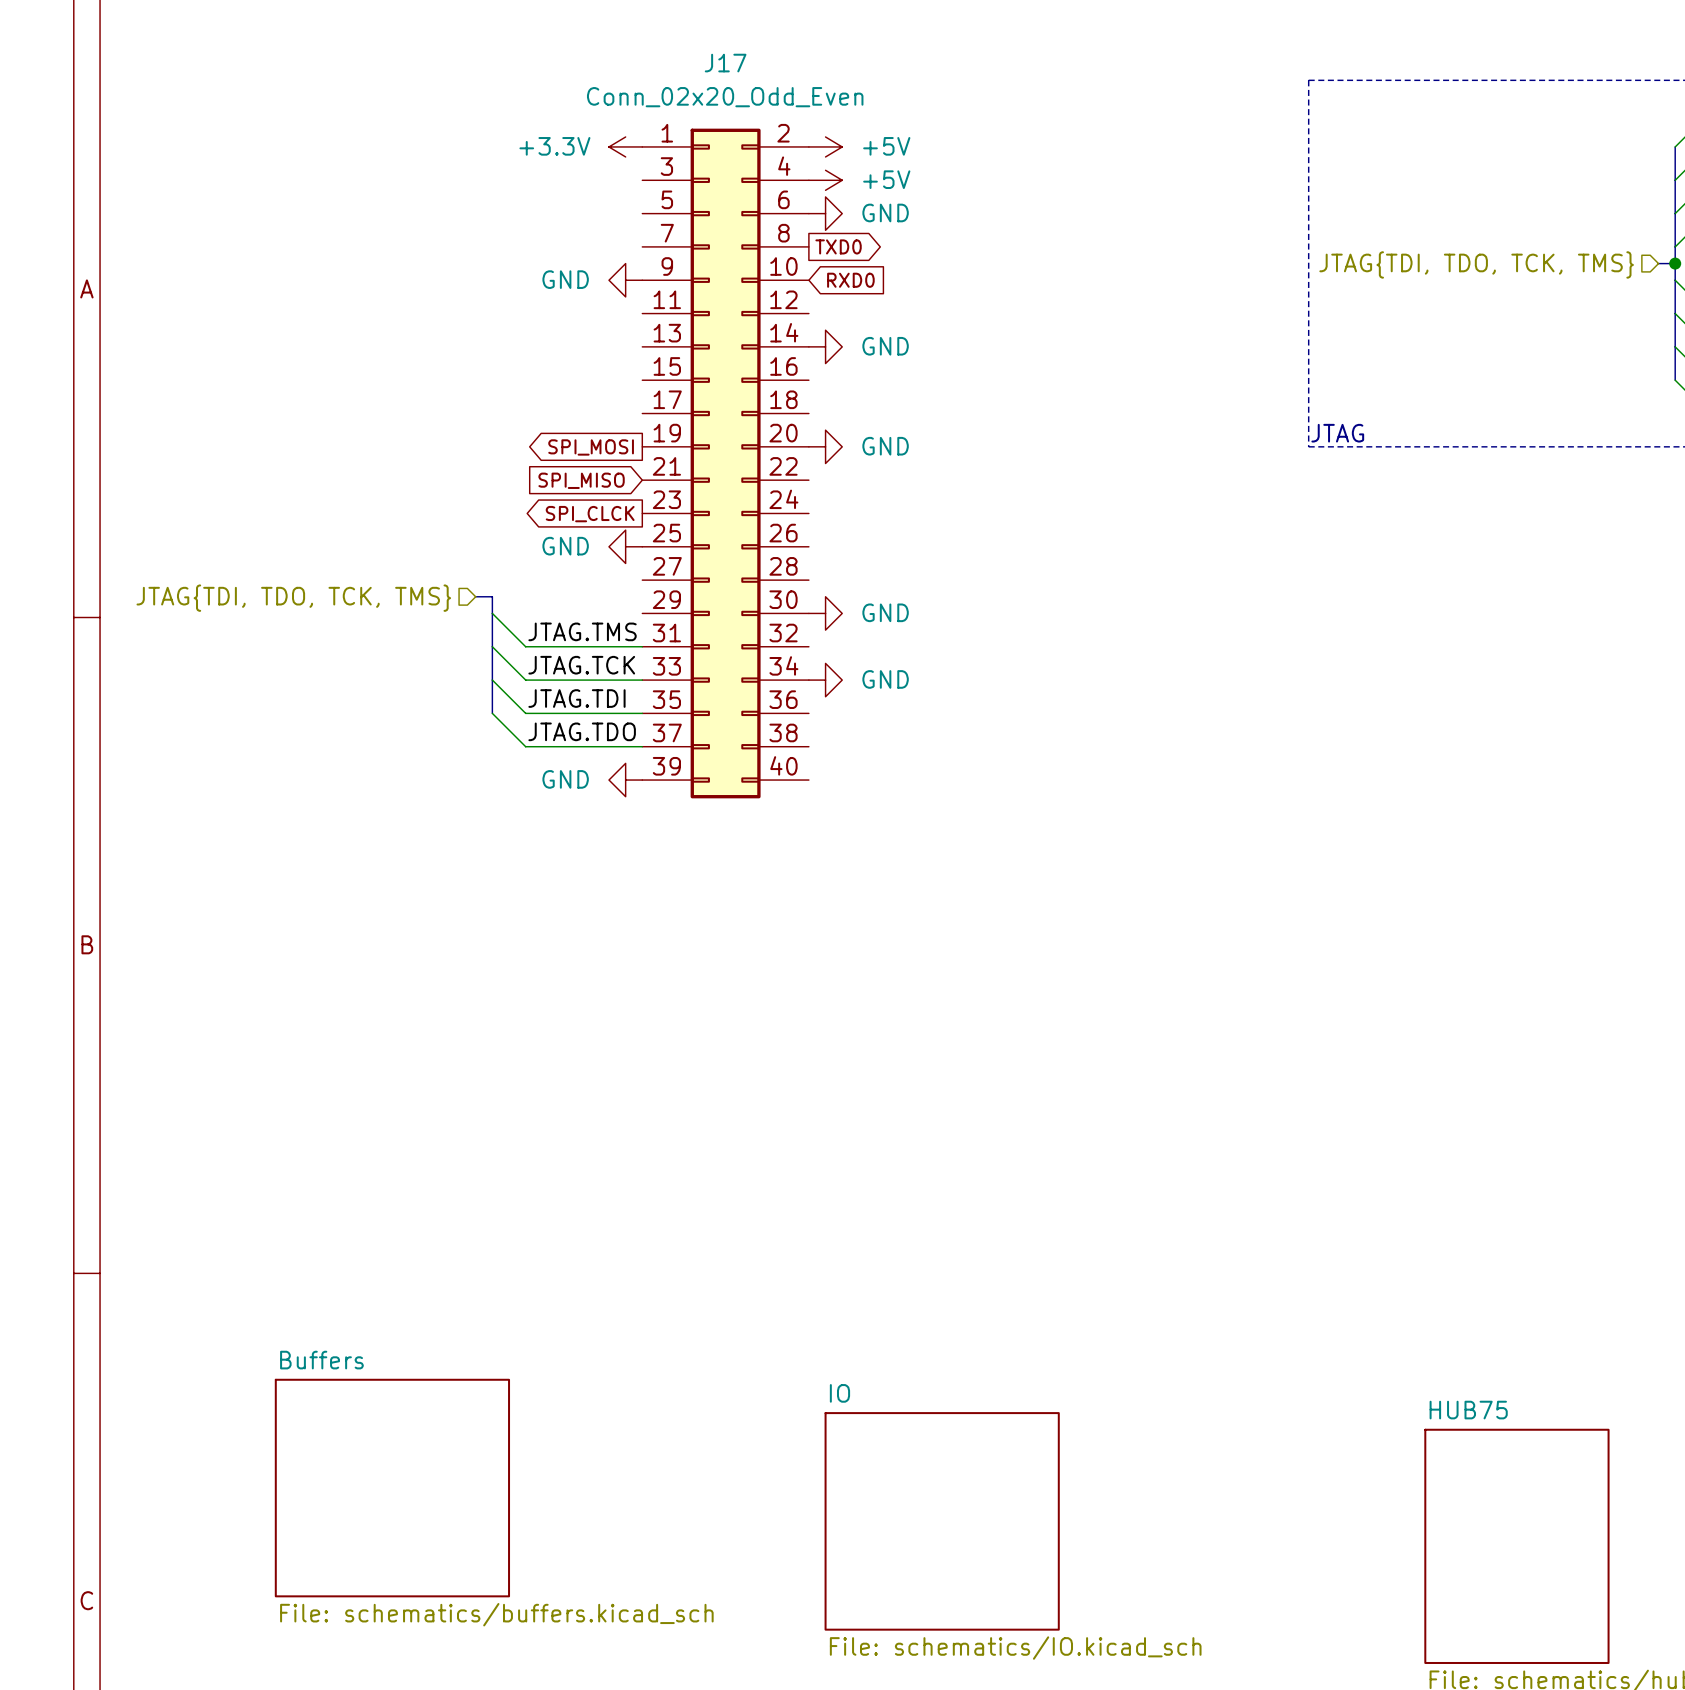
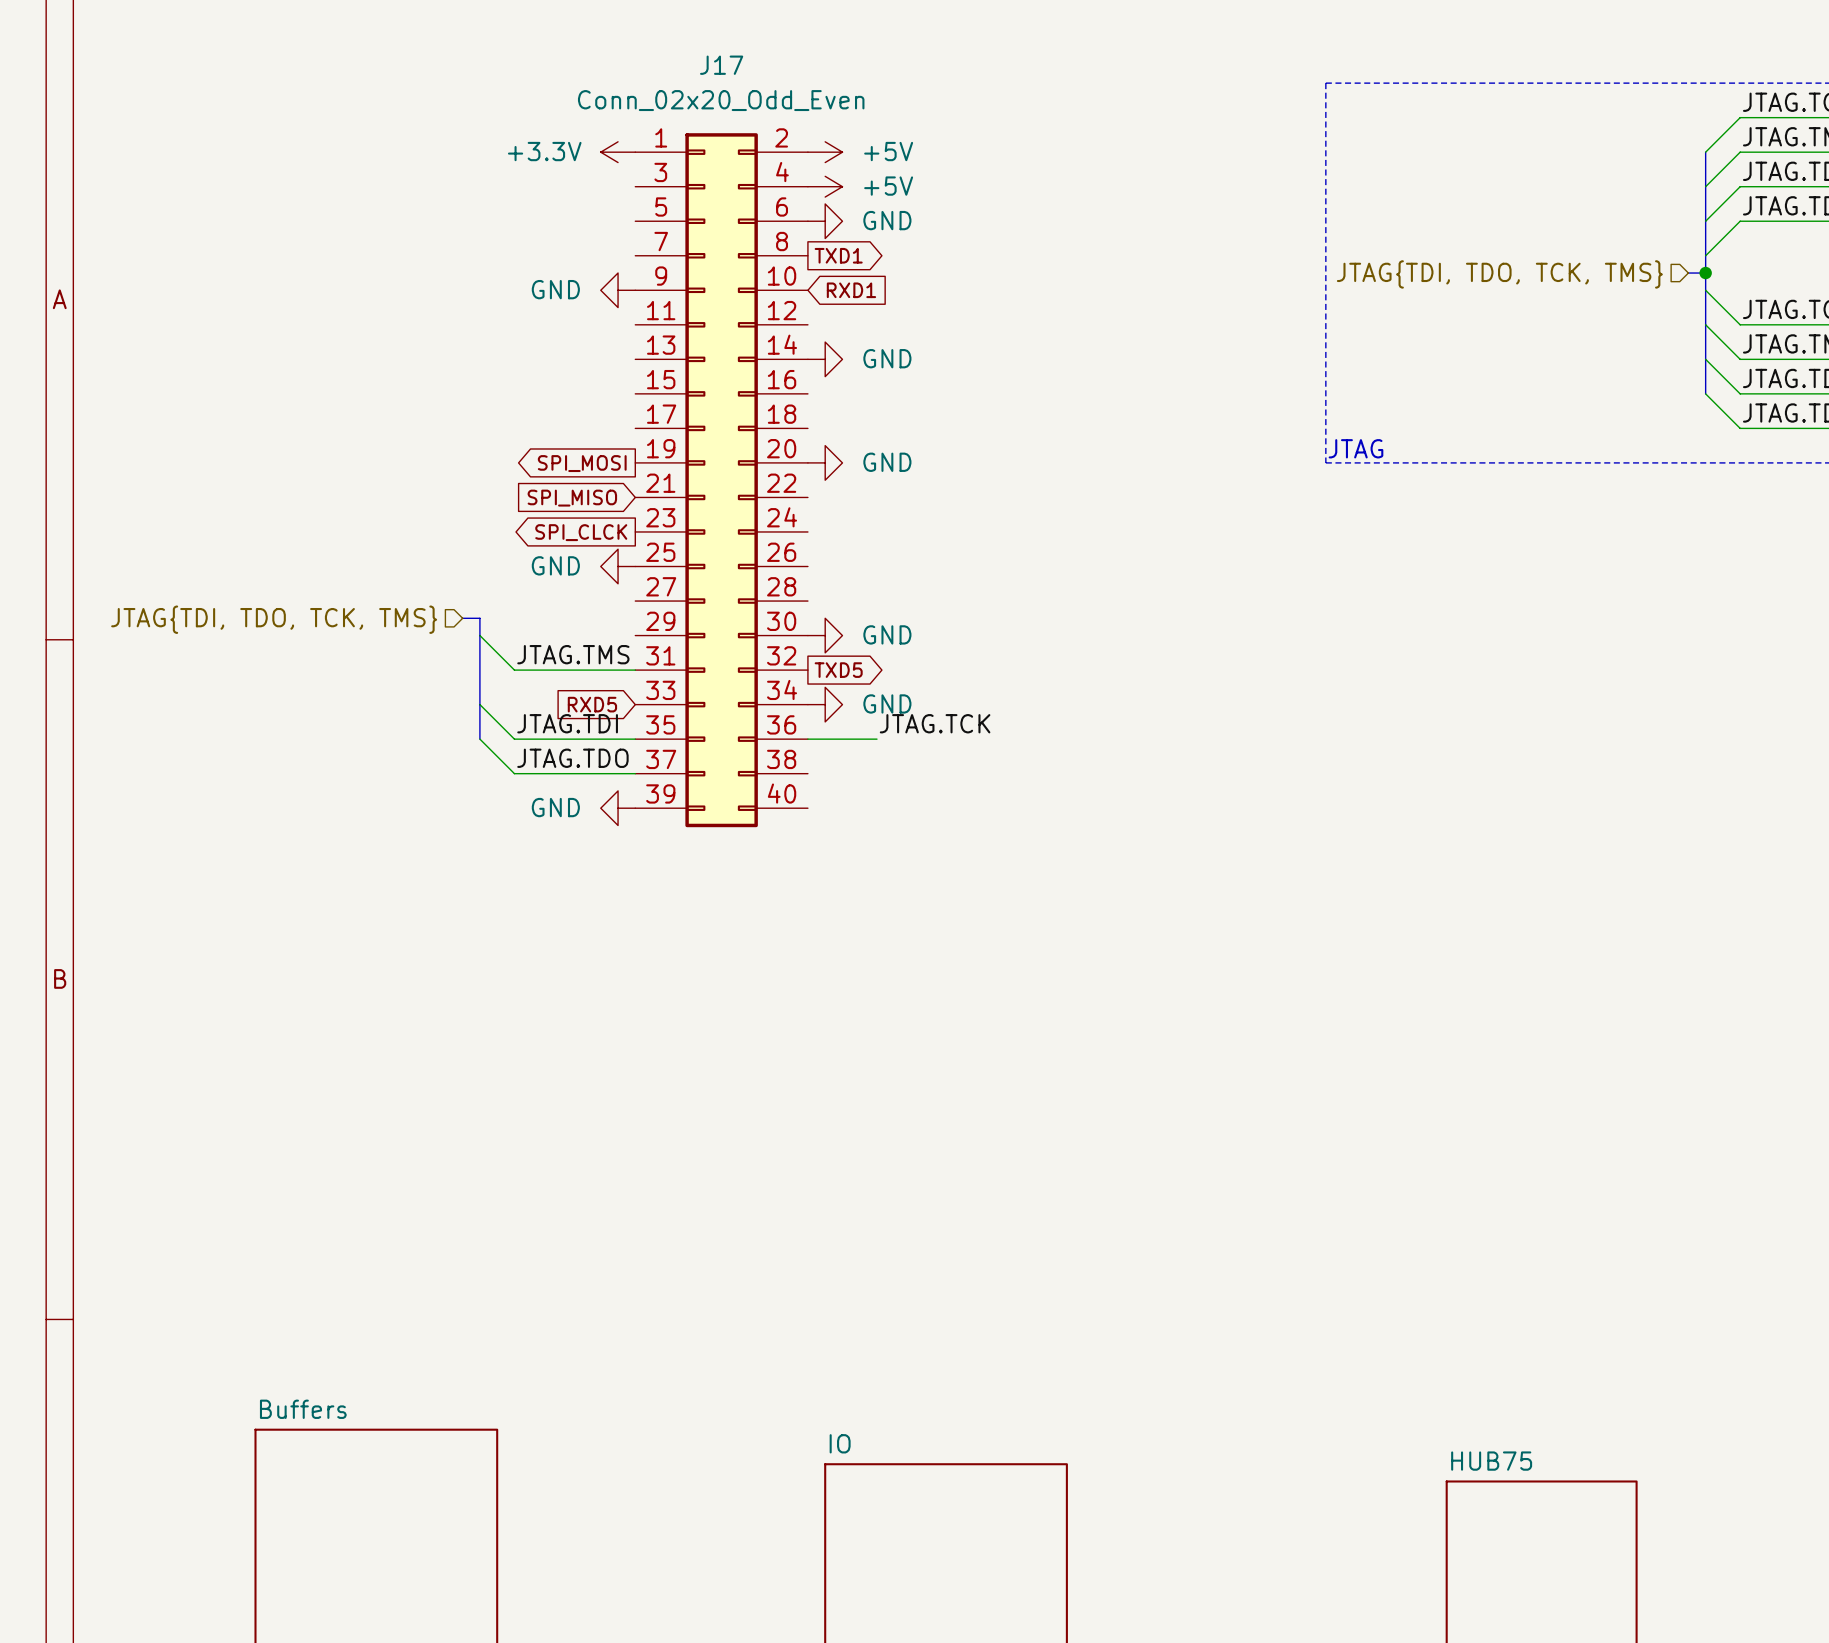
global label: TXD0 (838, 246) -> TXD1 (838, 255)
global label: RXD0 (850, 280) -> RXD1 (851, 290)
wire: (492, 646) (525, 680) (642, 680) -> none
global label: none -> TXD5 (838, 670)
label: JTAG.TCK (581, 665) -> none
global label: none -> RXD5 (592, 704)
label: none -> JTAG.TCK (935, 723)
wire: none -> (807, 739) (876, 739)

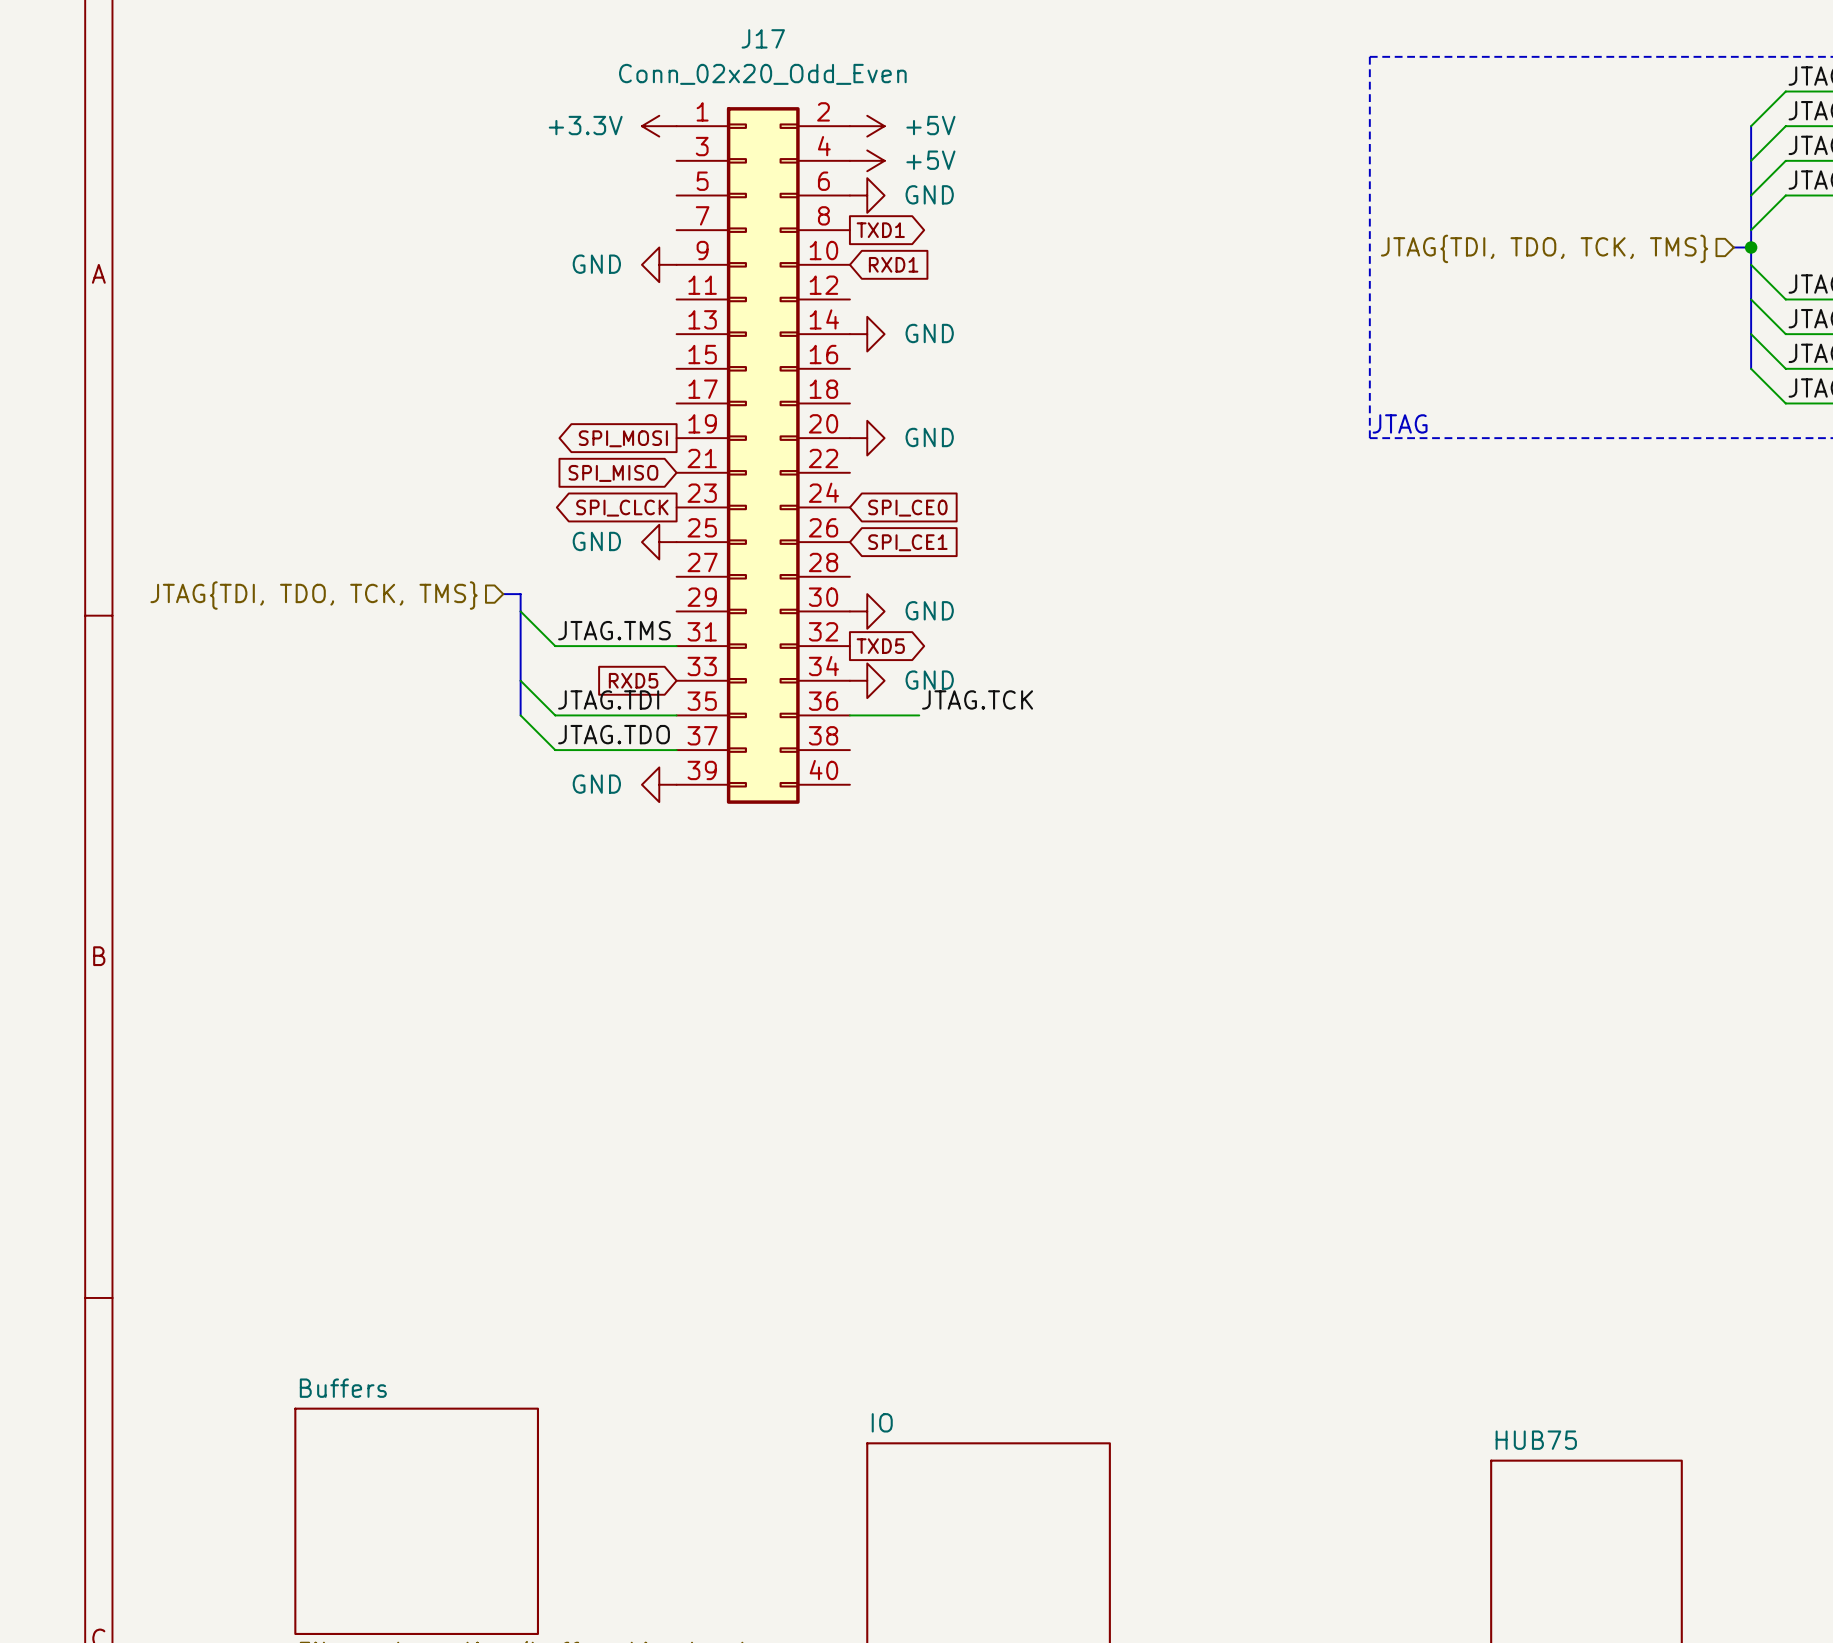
global label: none -> SPI_CE0 (907, 508)
global label: none -> SPI_CE1 (907, 542)

